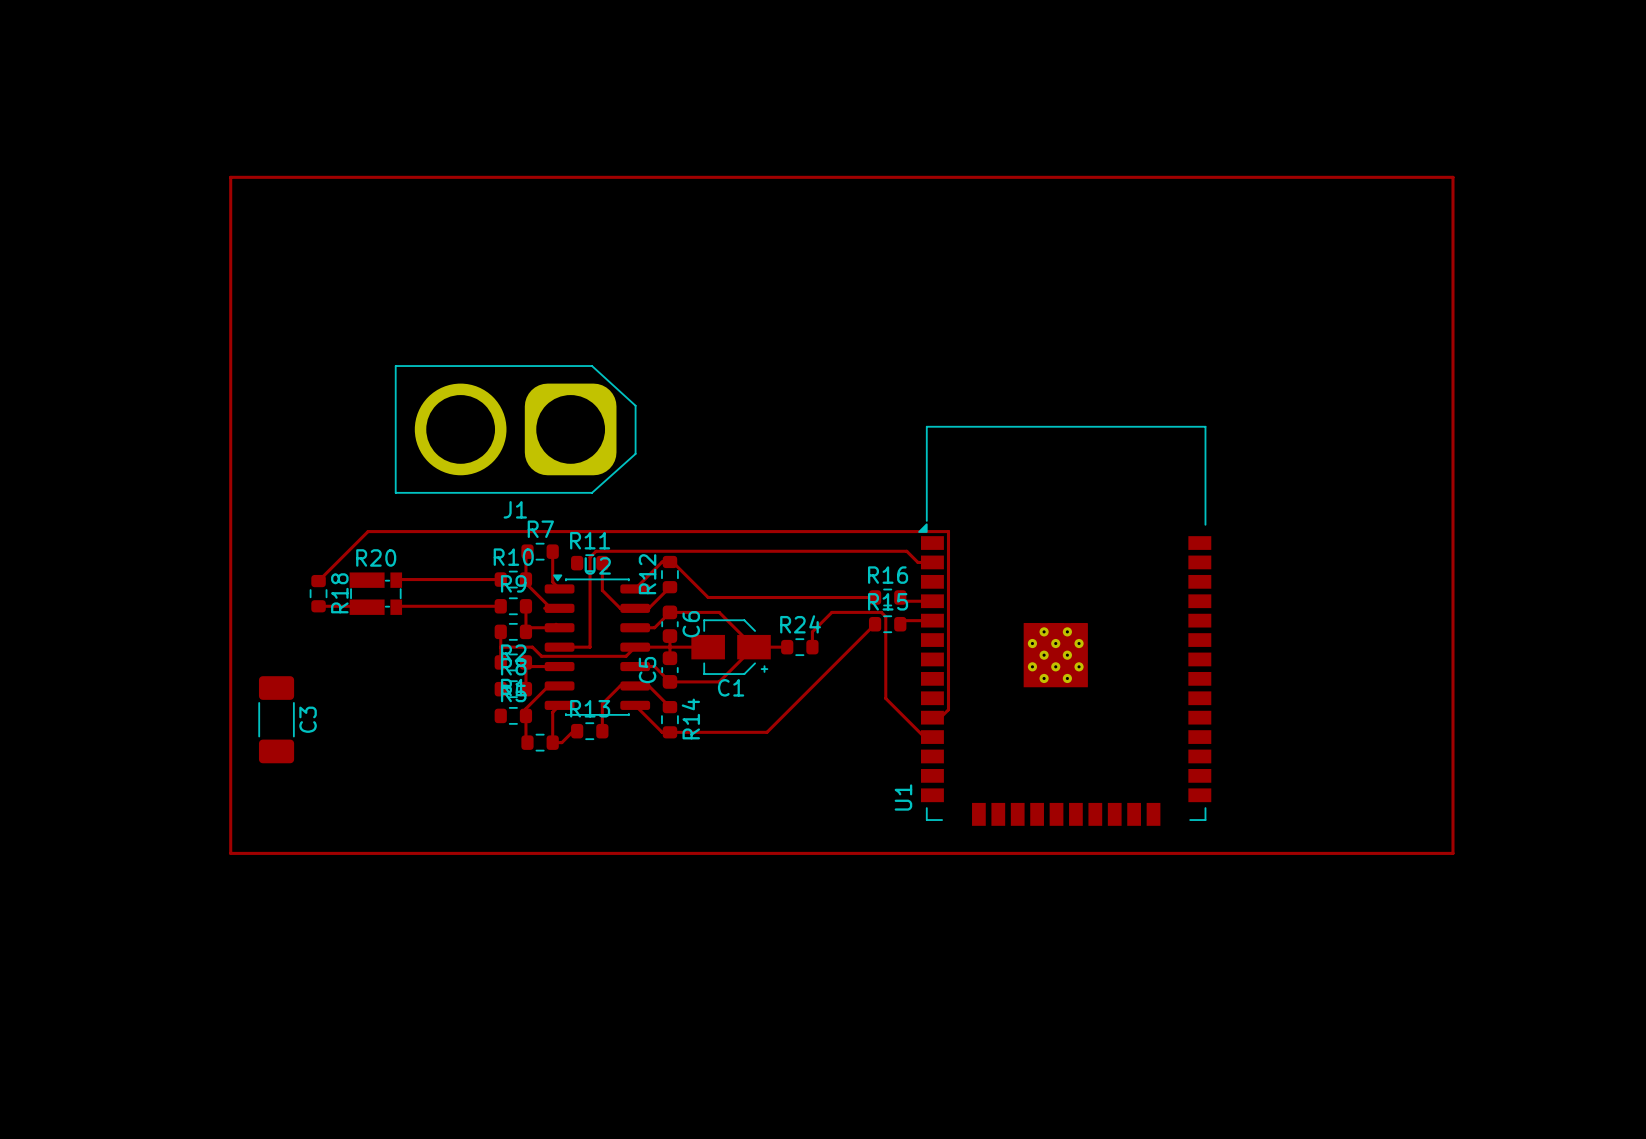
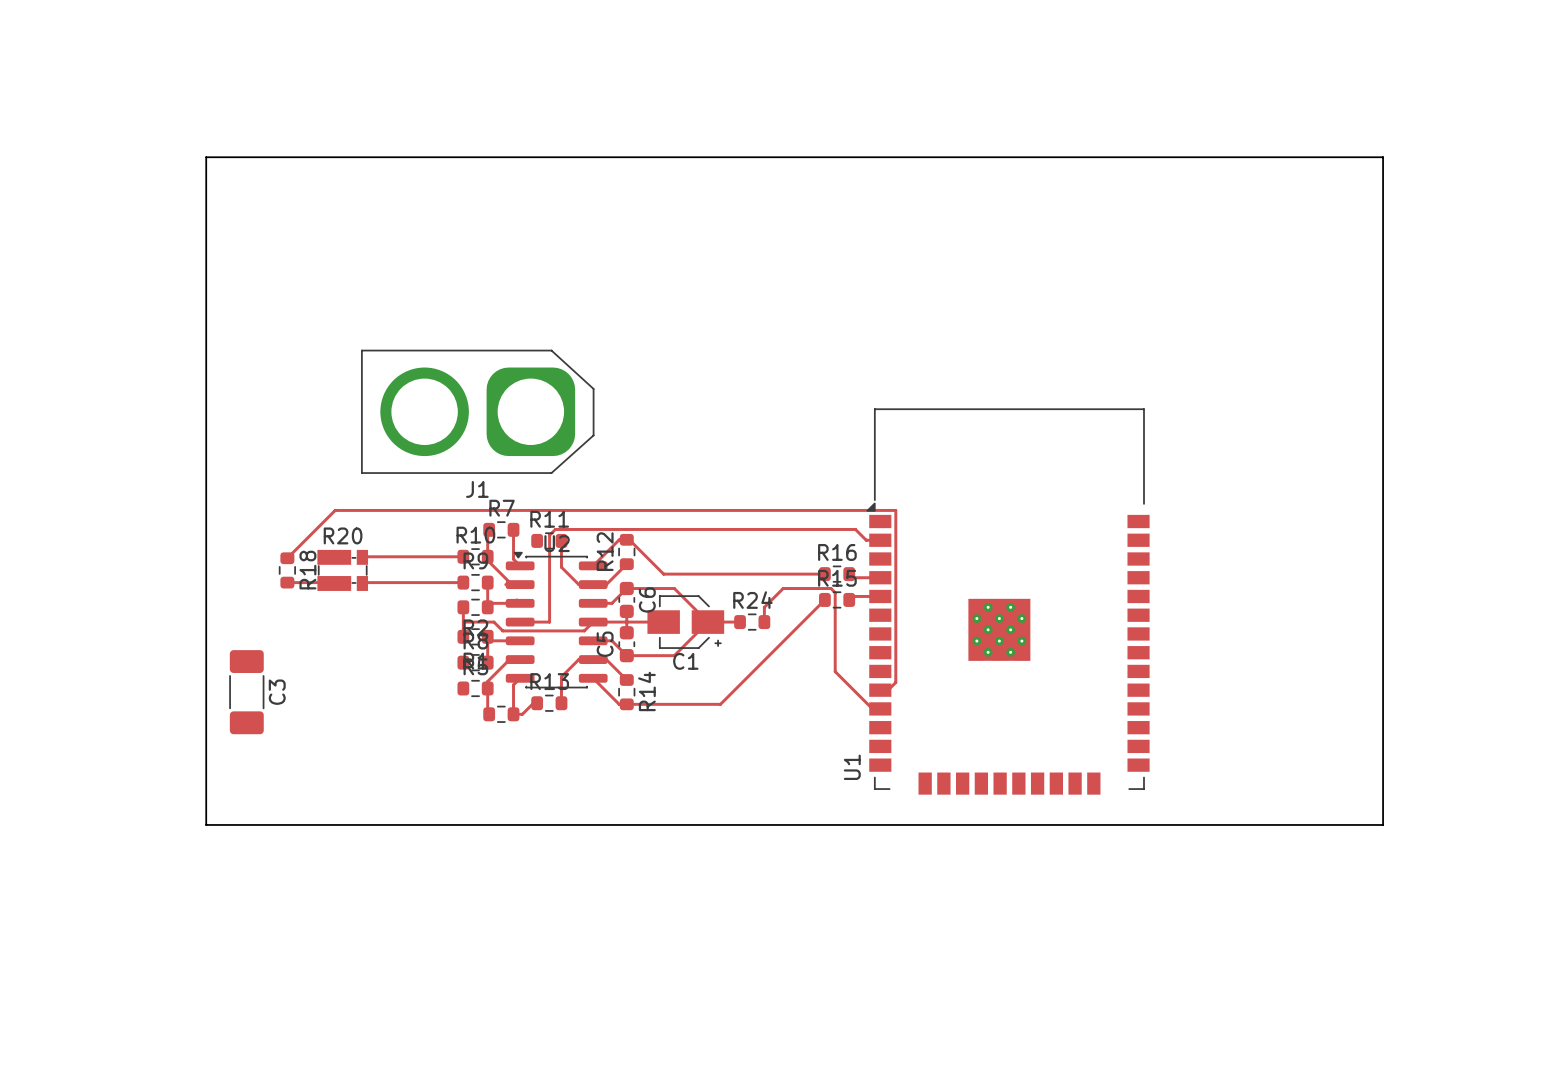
board edge: none -> (206, 157) (1383, 157) (1383, 824) (206, 824) (206, 157)
top track: (230, 177) (1452, 177) (1452, 853) (230, 853) (230, 177) -> none

